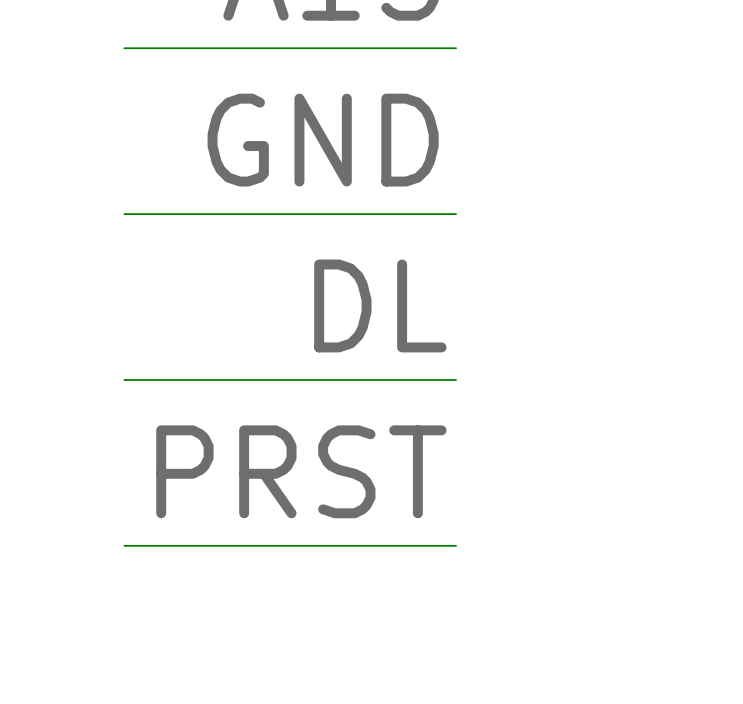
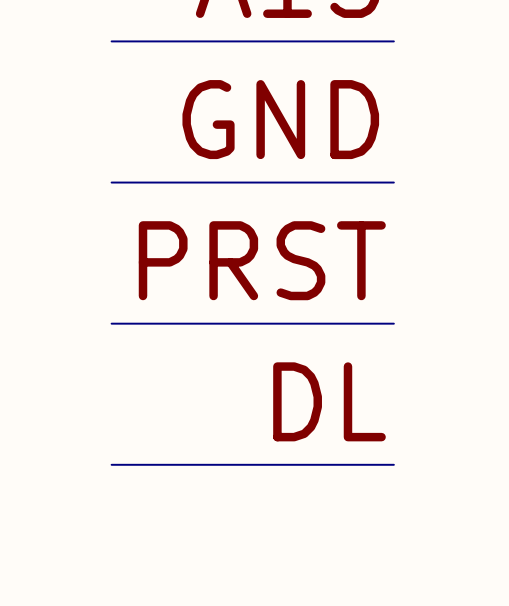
label: DL (380, 305) -> PRST (262, 260)
label: PRST (301, 471) -> DL (329, 401)

